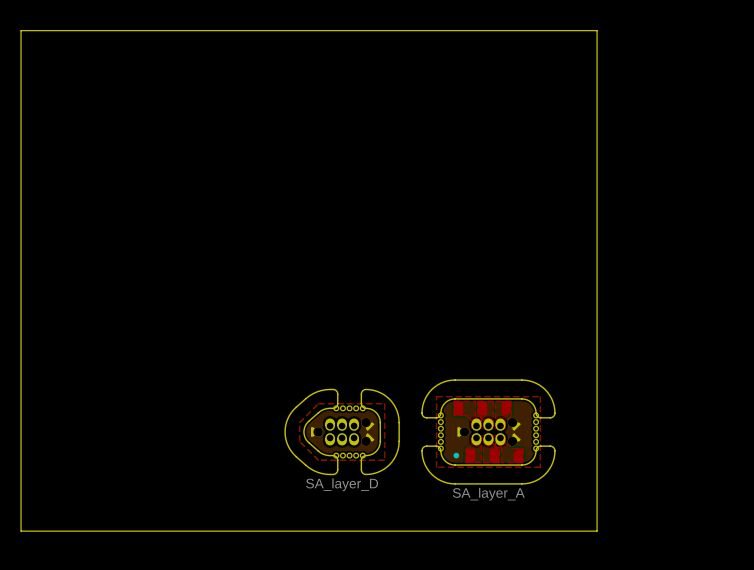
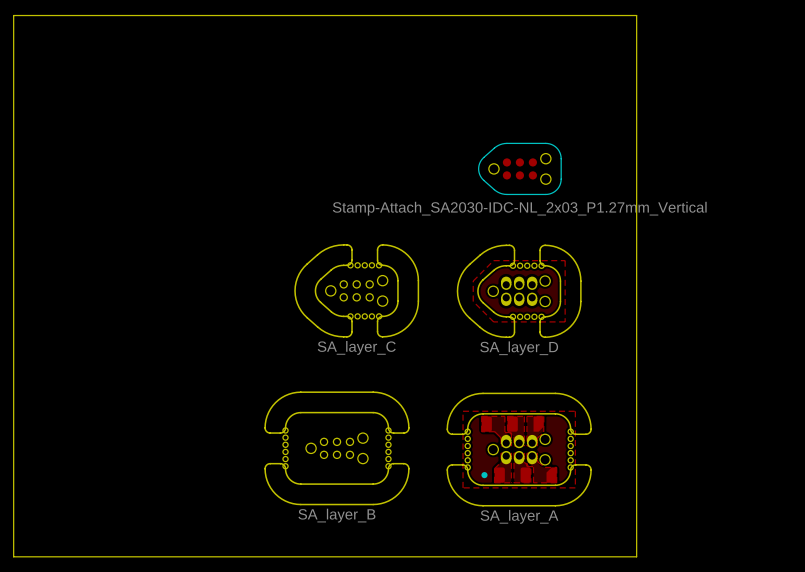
part: none -> Stamp-Attach_SA2030-IDC-NL_2x03_P1.27mm_Vertical (519, 168)
part: none -> SA_layer_C (356, 290)
part: none -> SA_layer_D (519, 291)
part footprint: [421, 379, 556, 485] -> [446, 392, 592, 507]
top zone outline: (318, 403) (299, 422) (299, 441) (318, 460) (384, 460) (384, 403) (318, 403) -> (493, 260) (473, 281) (473, 301) (493, 321) (565, 321) (565, 260) (493, 260)
part: none -> SA_layer_B (336, 448)
part: SA_layer_D (342, 431) -> none

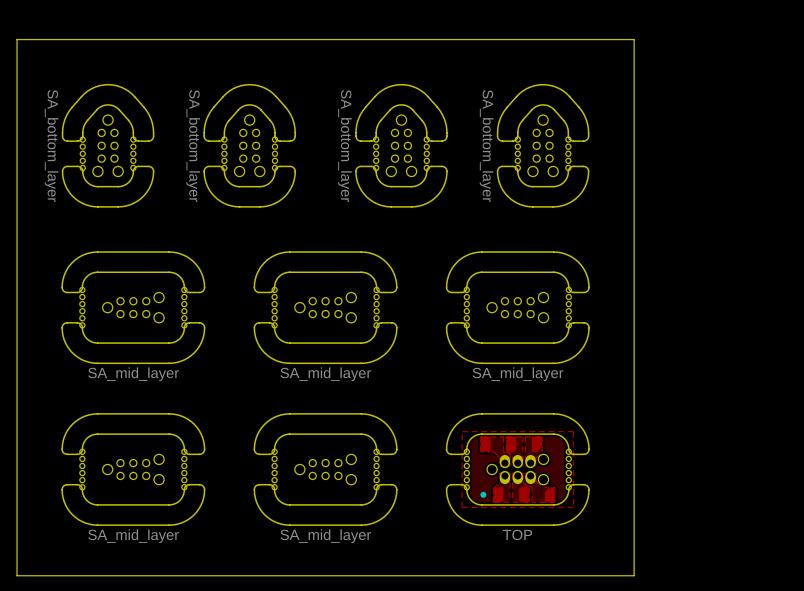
part: none -> SA_bottom_layer (108, 145)
part: none -> SA_bottom_layer (249, 145)
part: none -> SA_bottom_layer (401, 145)
part: none -> SA_bottom_layer (543, 145)
part: Stamp-Attach_SA2030-IDC-NL_2x03_P1.27mm_Vertical (519, 168) -> none
part footprint: [456, 244, 582, 339] -> [445, 251, 590, 365]
top zone outline: (493, 260) (473, 281) (473, 301) (493, 321) (565, 321) (565, 260) (493, 260) -> none
part: none -> SA_mid_layer (133, 307)
part: none -> SA_mid_layer (325, 307)
part: SA_layer_C (356, 290) -> none
part value: SA_layer_D (519, 348) -> SA_mid_layer (518, 374)
part: SA_layer_B (336, 448) -> none
part: none -> SA_mid_layer (133, 469)
part: none -> SA_mid_layer (325, 469)
part value: SA_layer_A (519, 516) -> TOP (517, 534)

